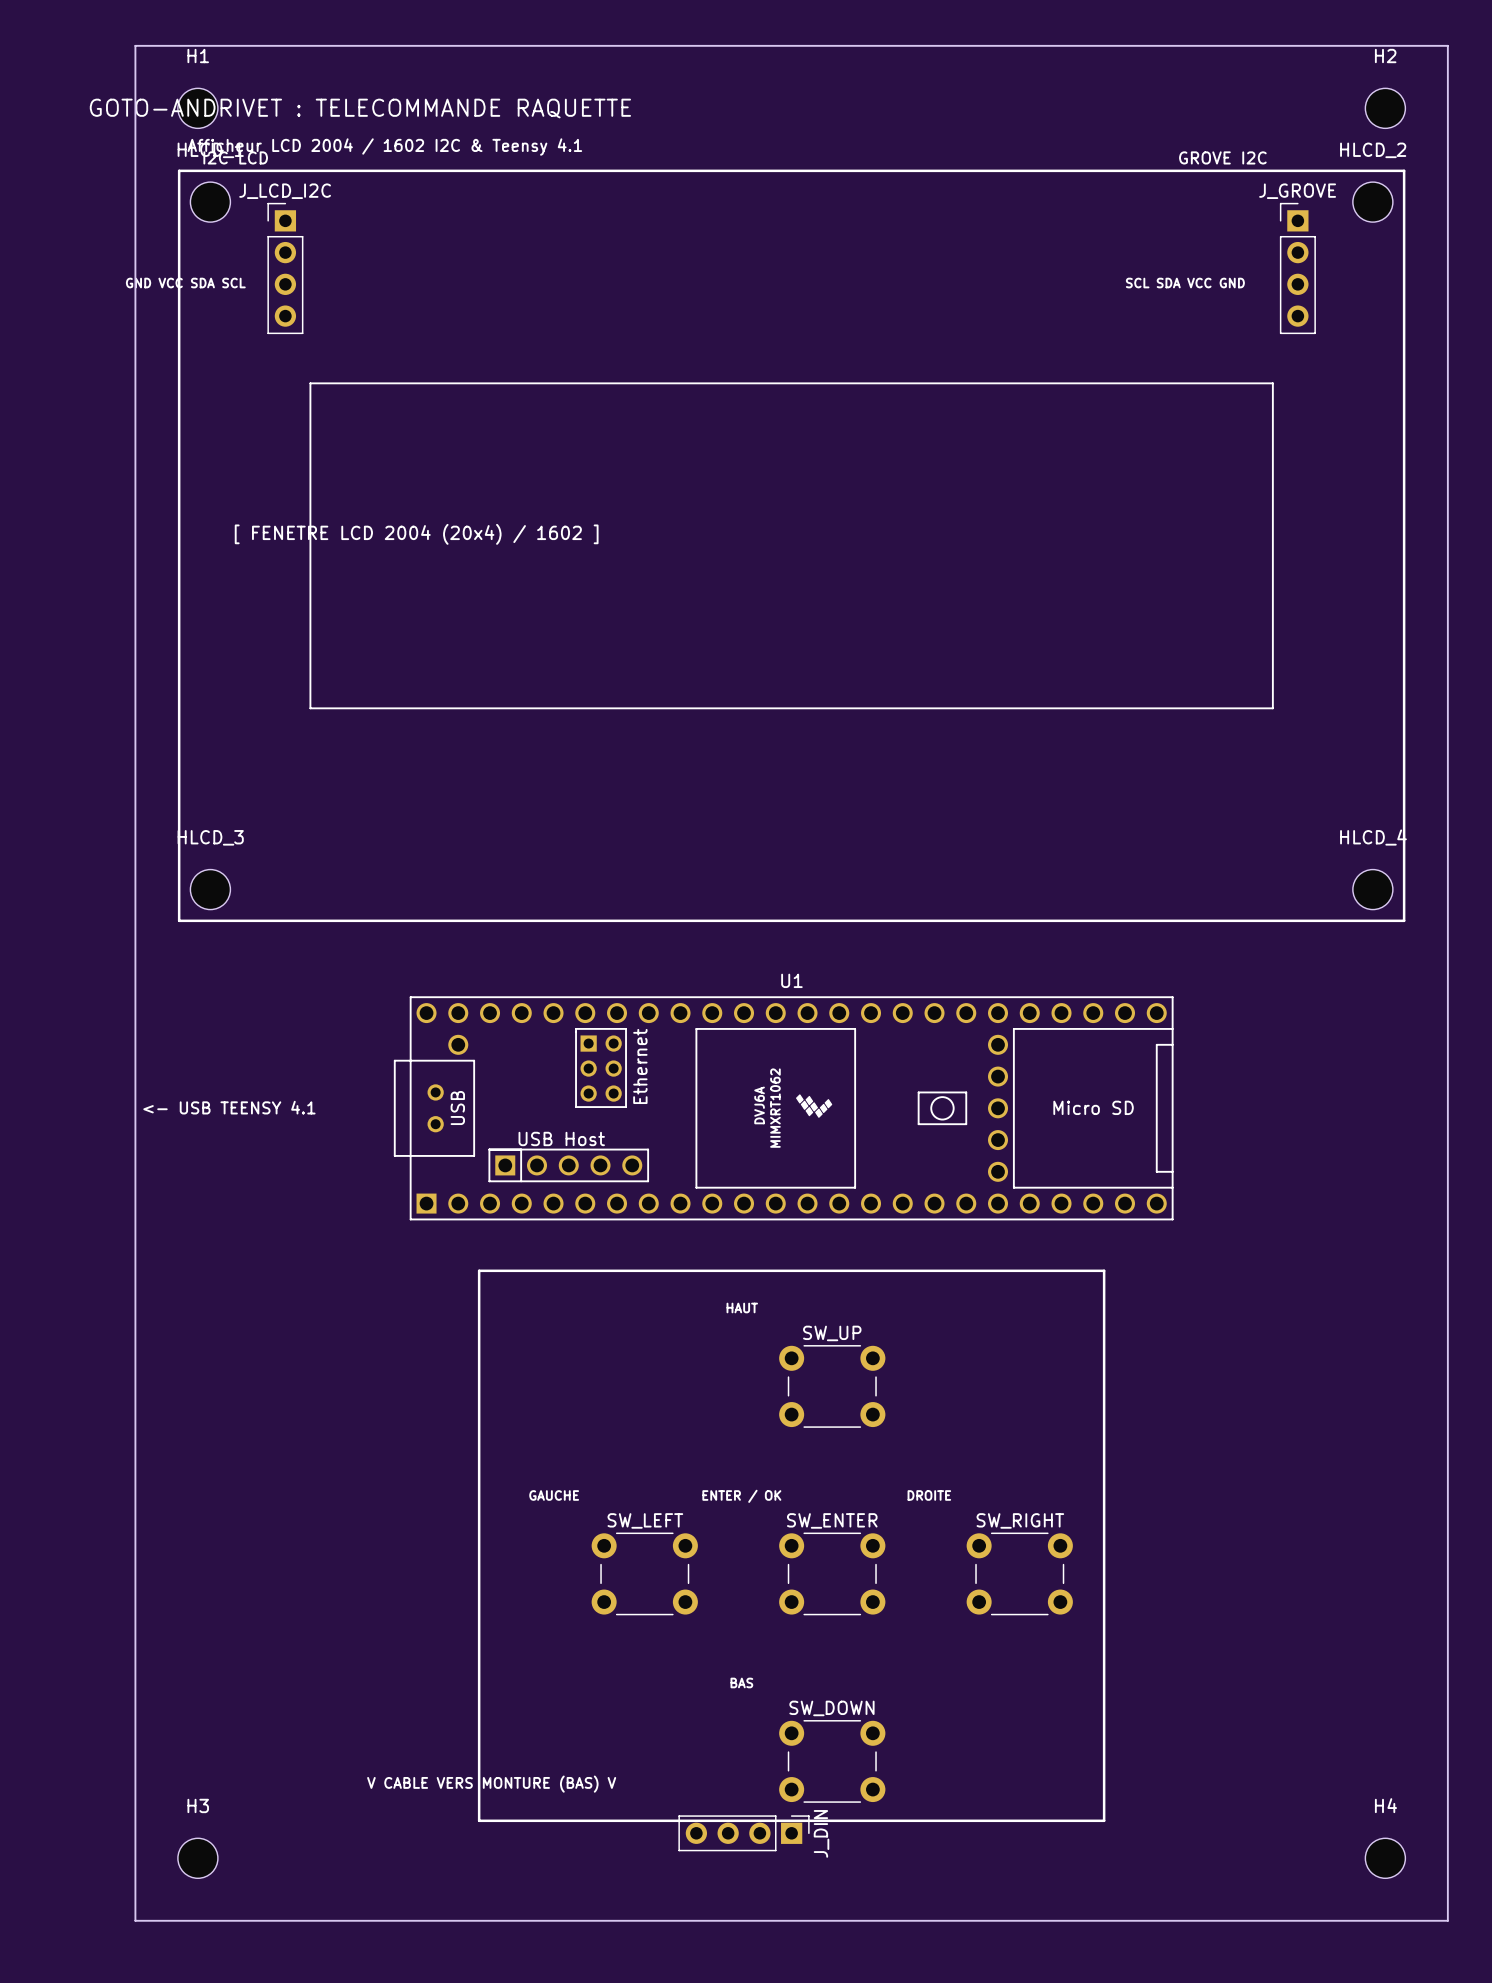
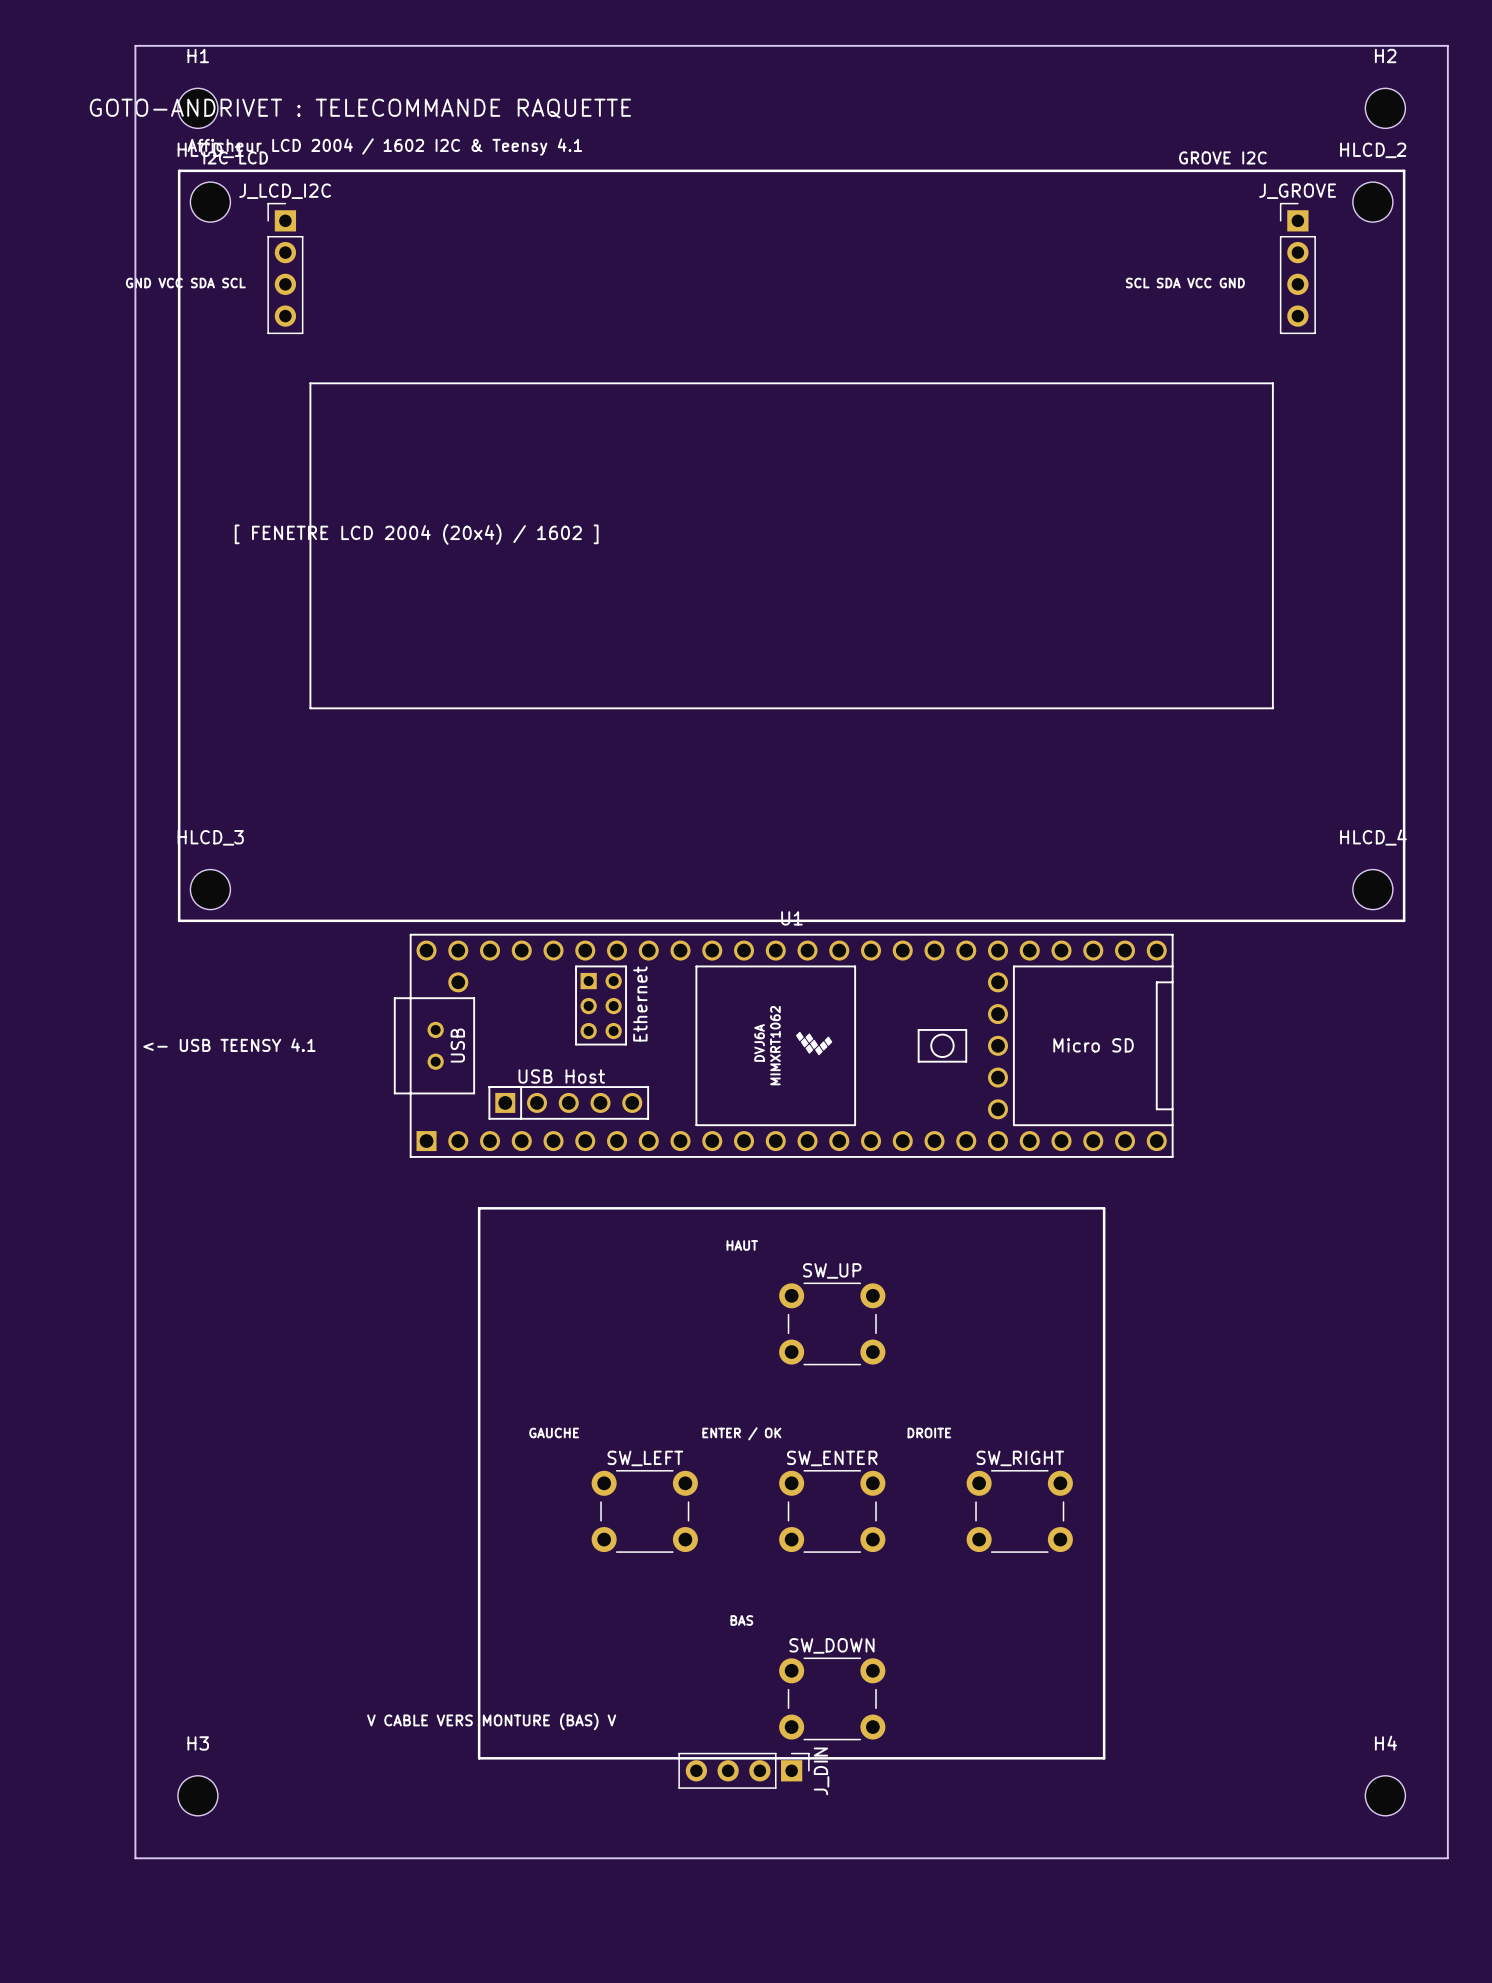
text position: <- USB TEENSY 4.1 (229, 1107) -> <- USB TEENSY 4.1 (229, 1045)
U1 position: (783, 1108) -> (783, 1045)
line: (479, 1270) (1104, 1270) -> (479, 1270) (479, 1208) (1104, 1208) (1104, 1270)
text position: HAUT (742, 1307) -> HAUT (742, 1245)
SW_UP position: (832, 1386) -> (832, 1323)
text position: GAUCHE (554, 1495) -> GAUCHE (554, 1432)
text position: DROITE (929, 1495) -> DROITE (929, 1432)
text position: ENTER / OK (741, 1496) -> ENTER / OK (741, 1433)
SW_LEFT position: (644, 1573) -> (644, 1511)
SW_ENTER position: (832, 1573) -> (832, 1511)
SW_RIGHT position: (1019, 1573) -> (1019, 1511)
text position: BAS (741, 1682) -> BAS (741, 1620)
line: (479, 1758) (479, 1820) (1104, 1820) (1104, 1758) -> (479, 1758) (1104, 1758)
SW_DOWN position: (832, 1761) -> (832, 1698)
text position: V CABLE VERS MONTURE (BAS) V (491, 1784) -> V CABLE VERS MONTURE (BAS) V (491, 1721)
J_DIN position: (744, 1833) -> (744, 1770)
board edge: (135, 1858) (135, 1920) (1447, 1920) (1447, 1858) -> (135, 1858) (1447, 1858)
H3 position: (197, 1858) -> (197, 1795)
H4 position: (1385, 1858) -> (1385, 1795)

